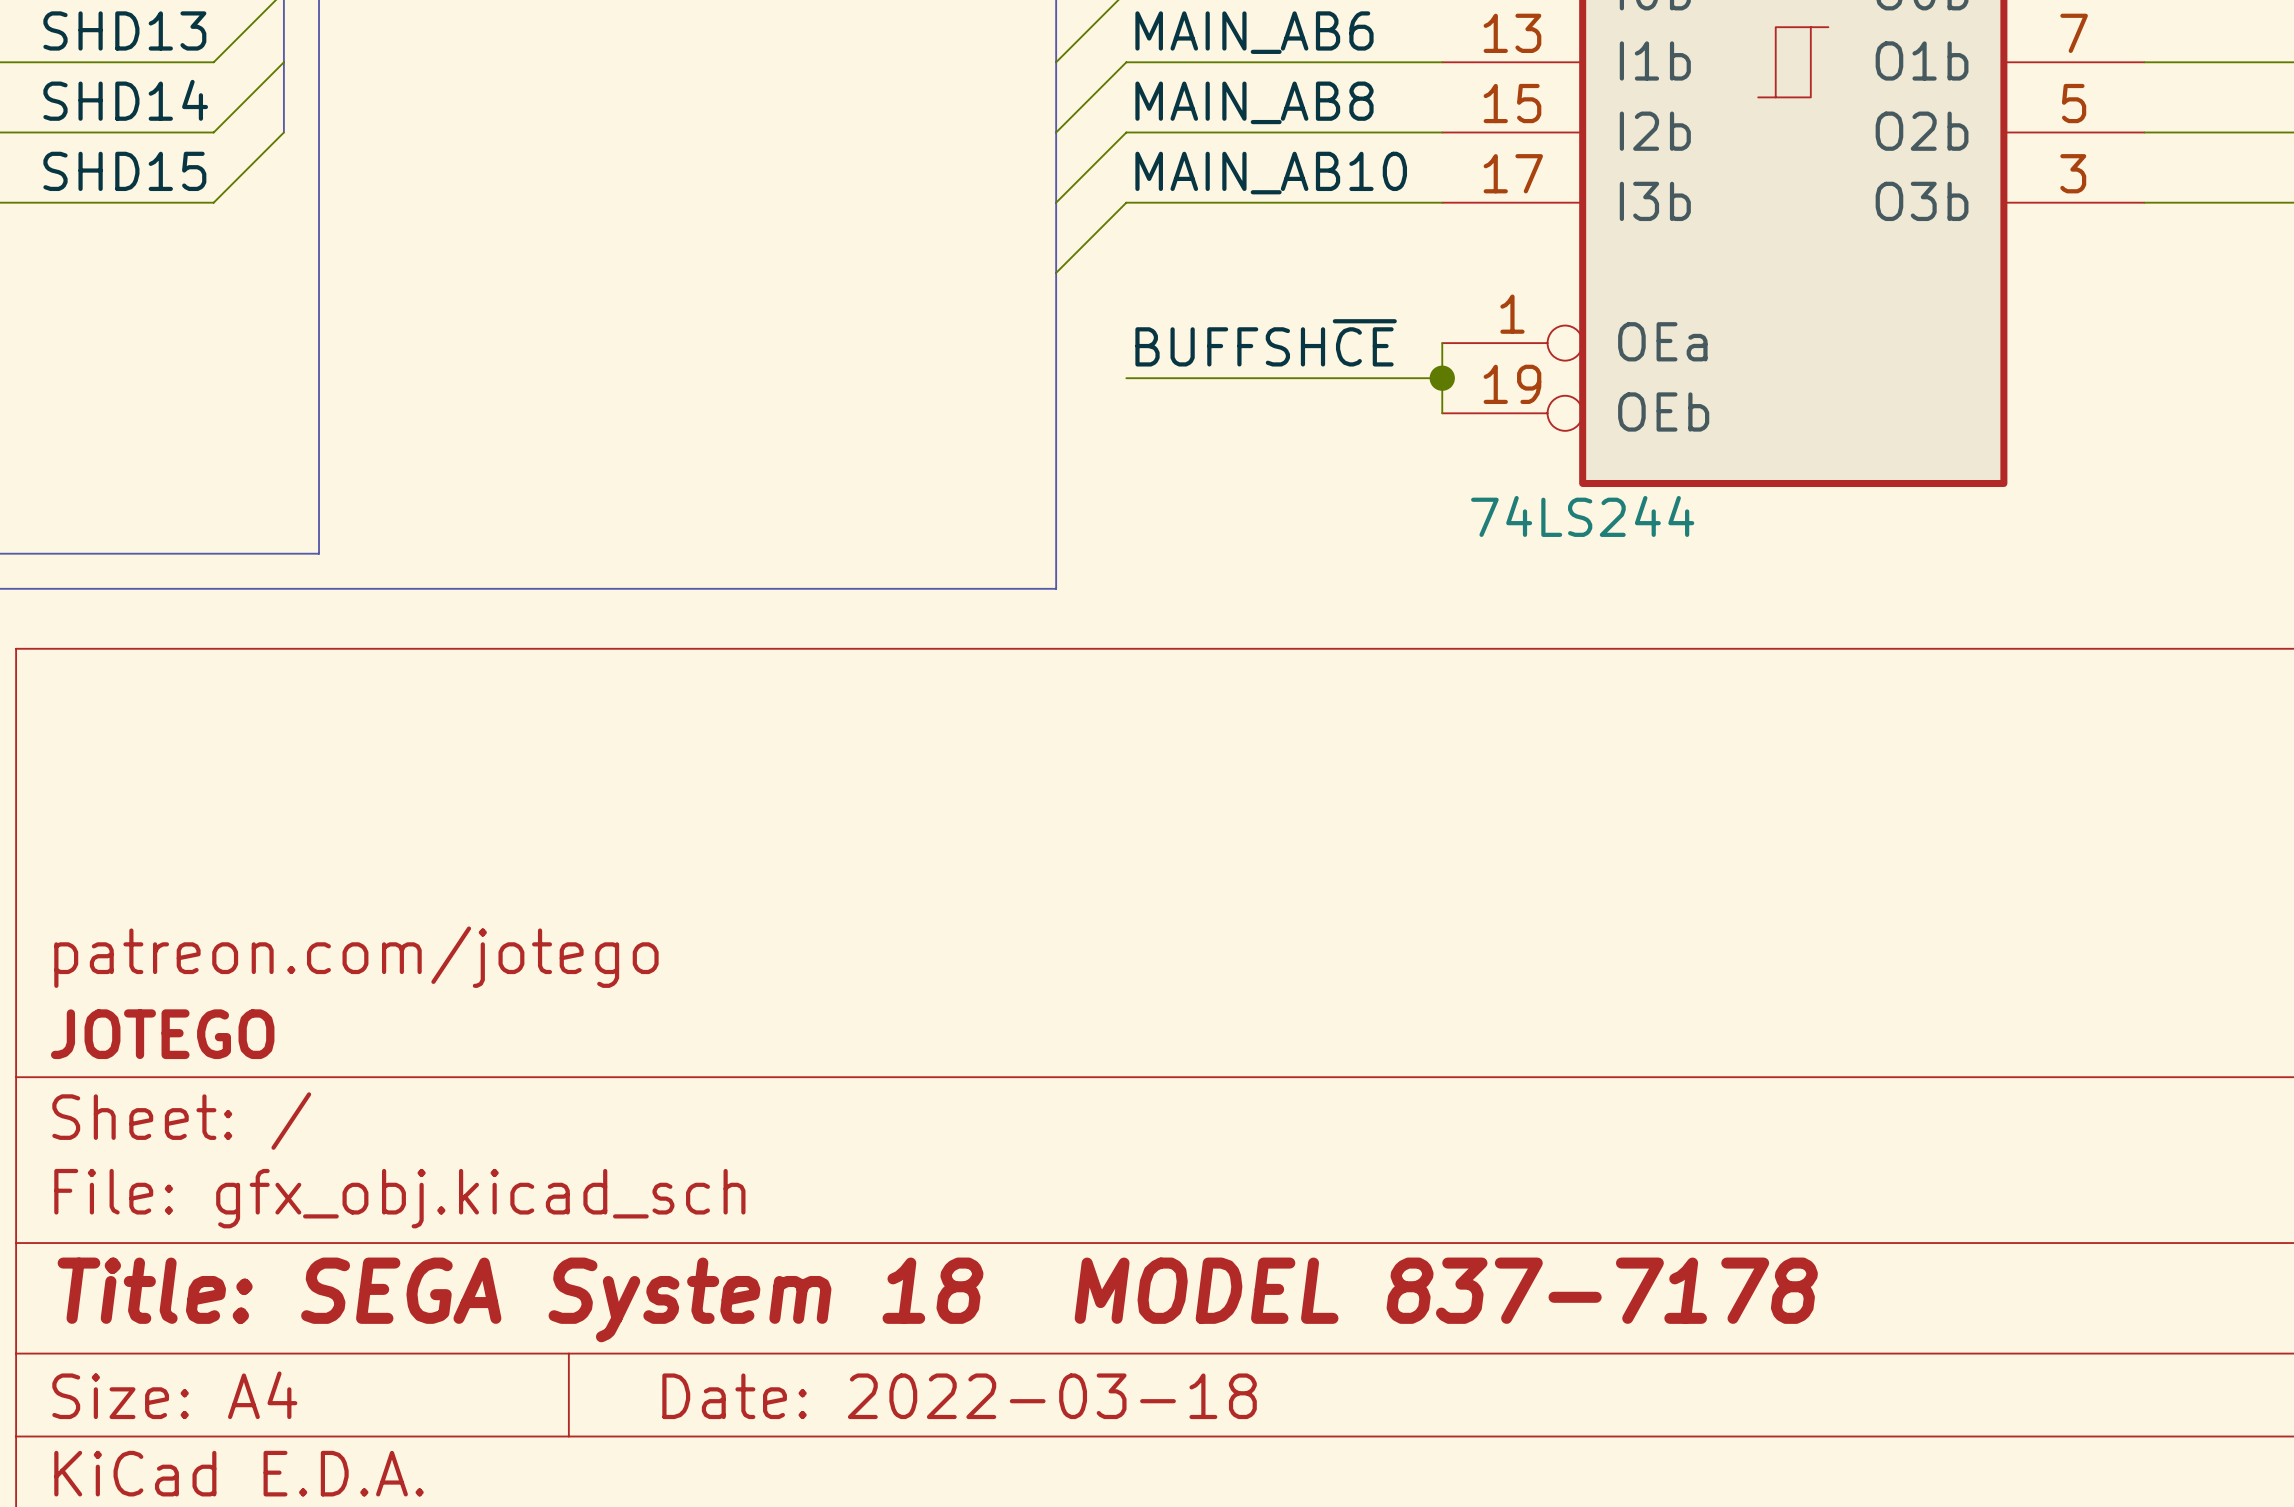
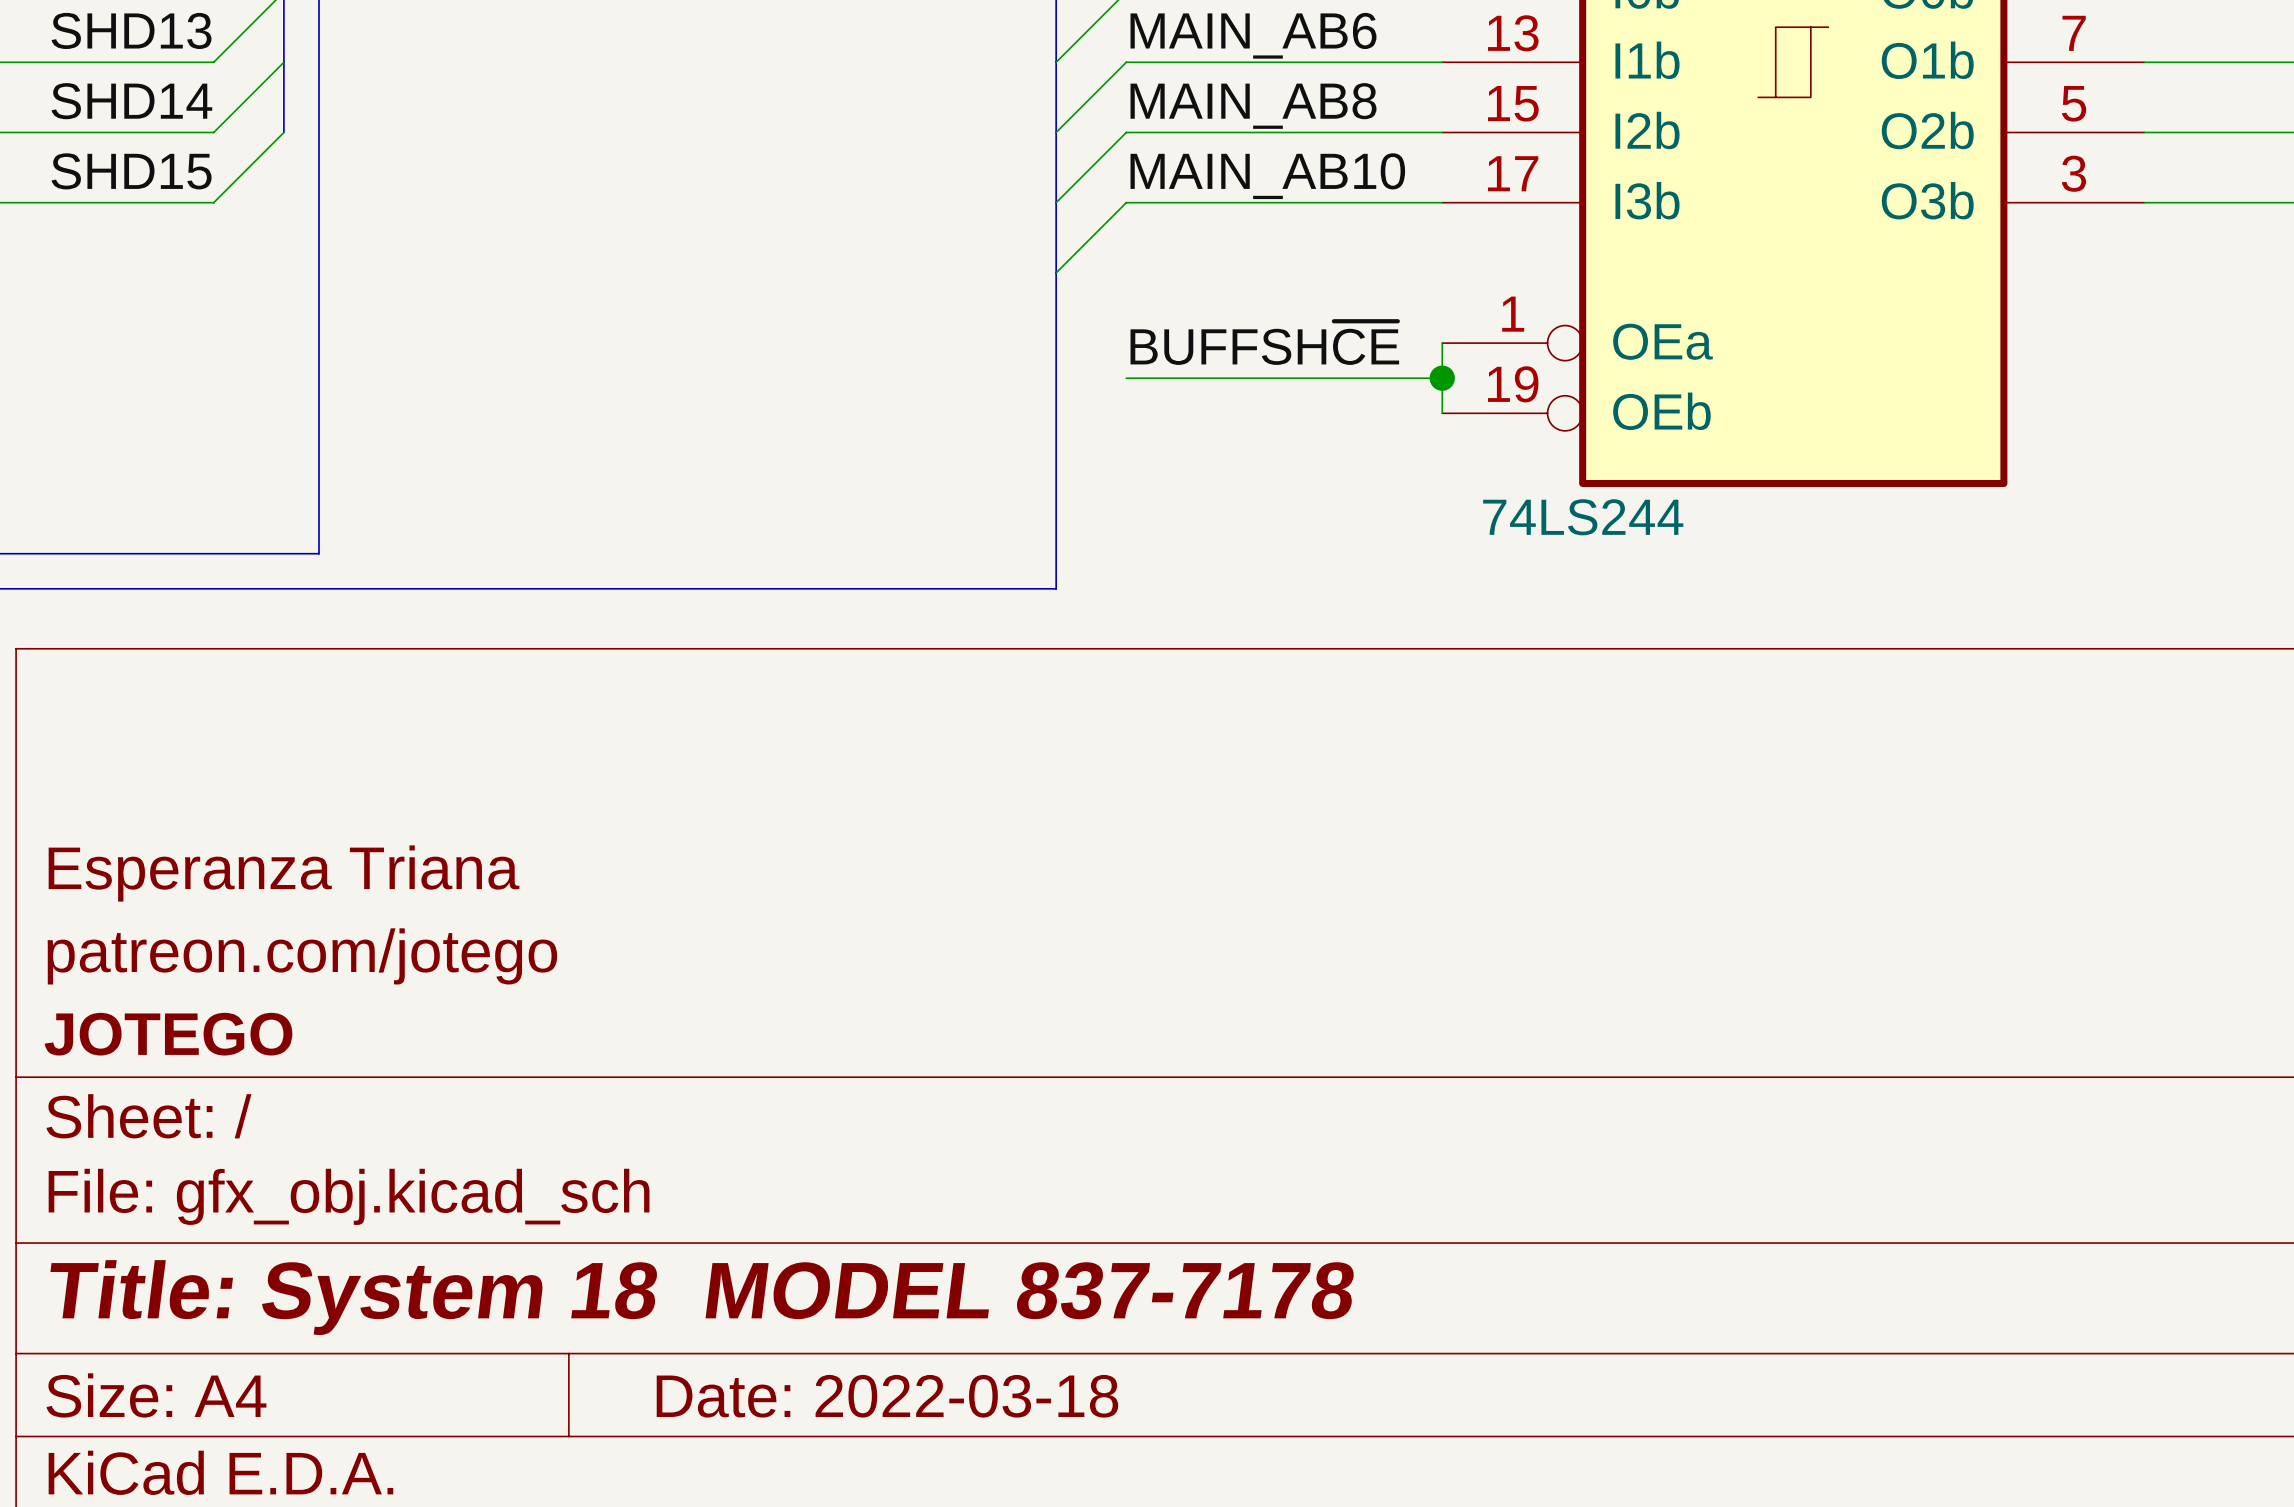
title block: none -> Esperanza Triana (284, 873)
title block: Title: SEGA System 18 MODEL 837-7178 (937, 1299) -> Title: System 18 MODEL 837-7178 (702, 1297)

